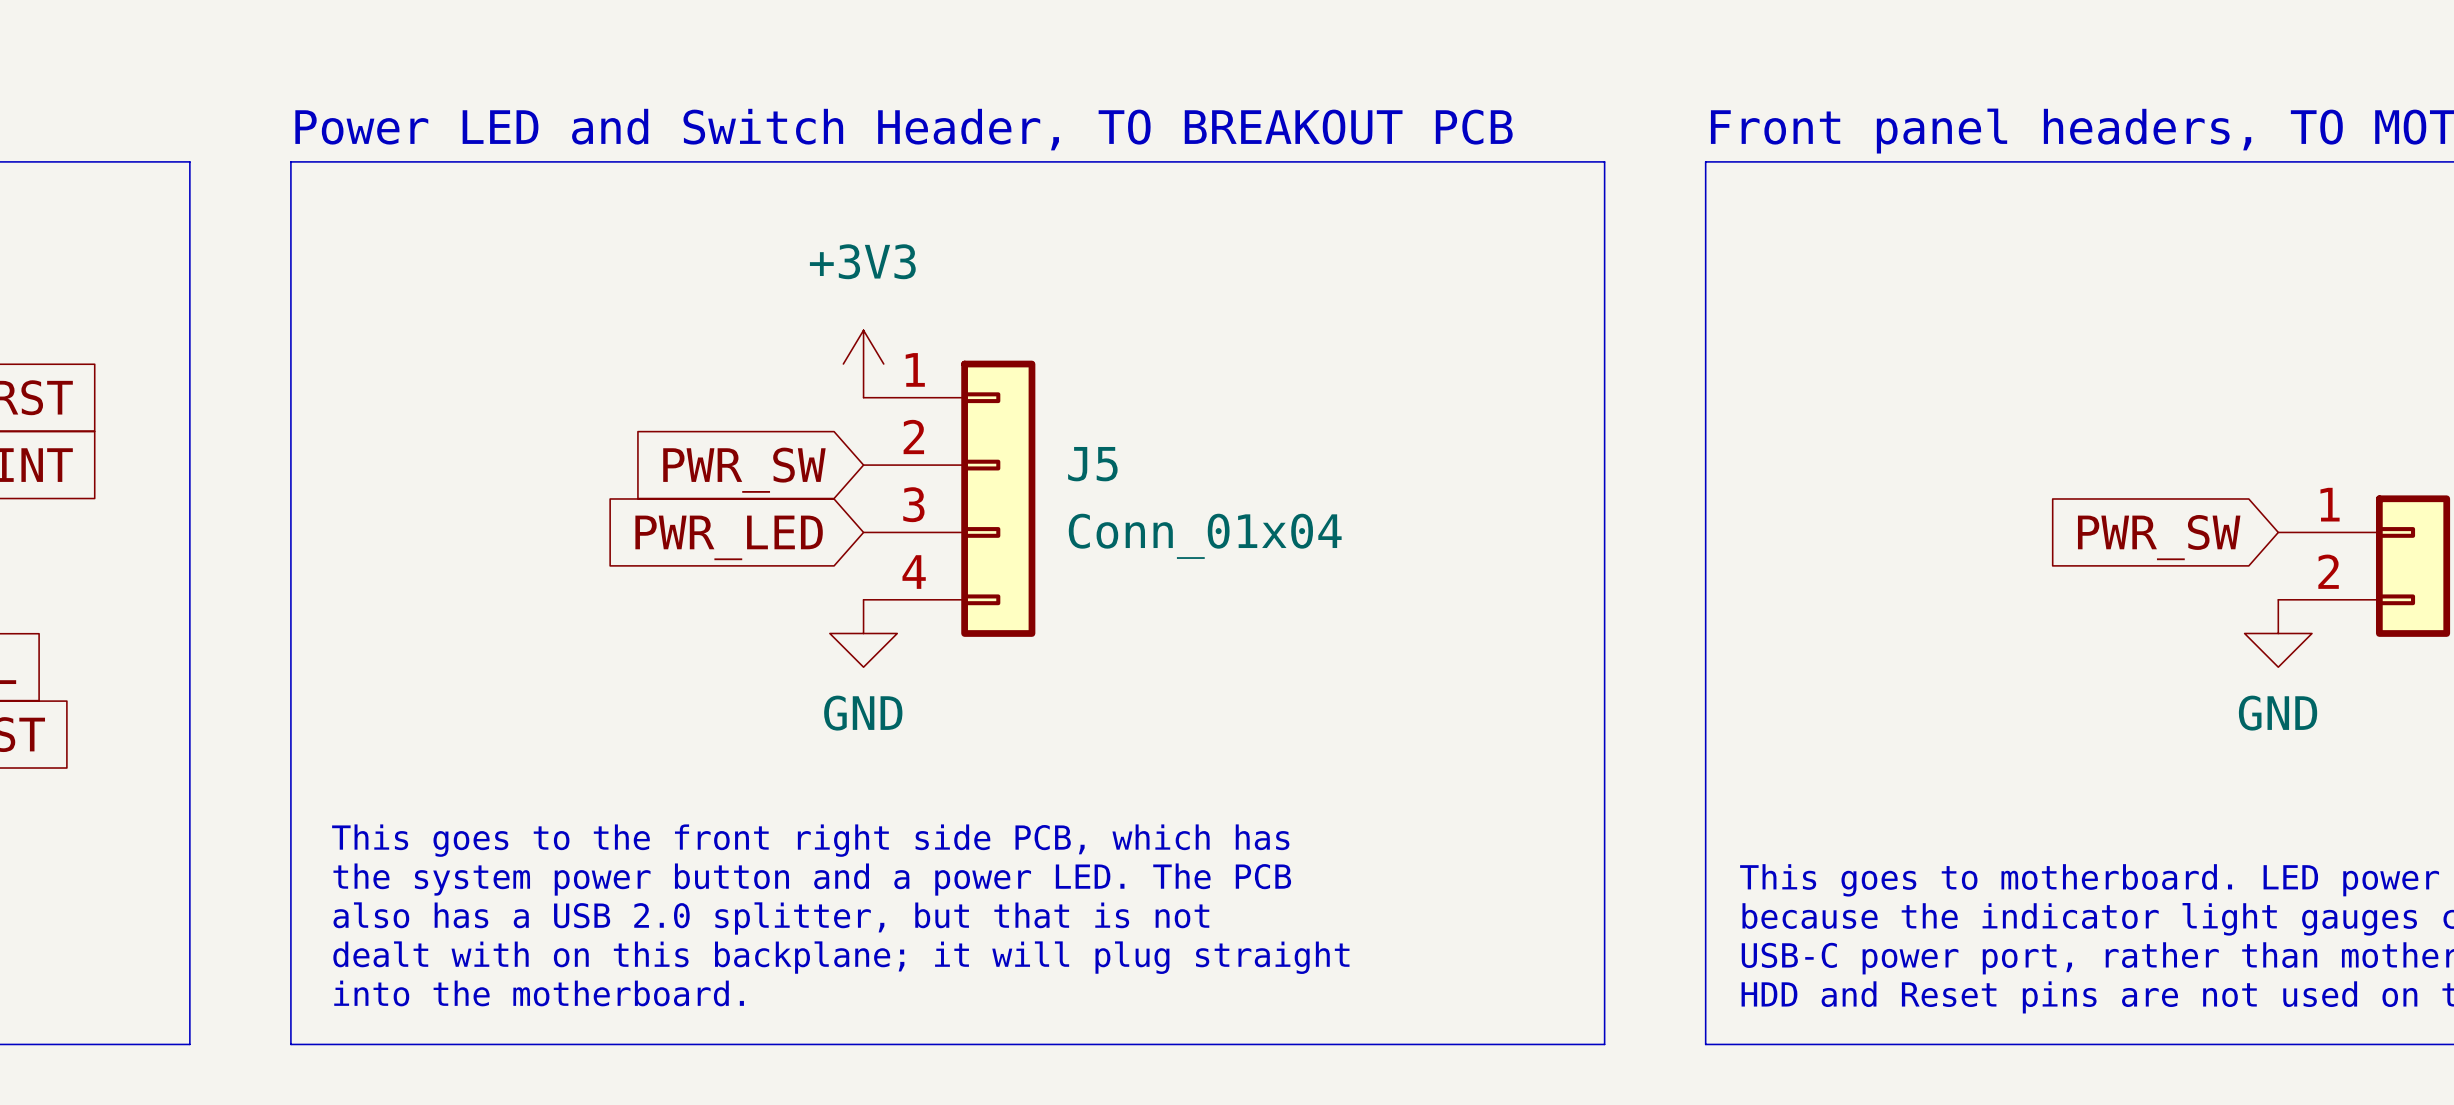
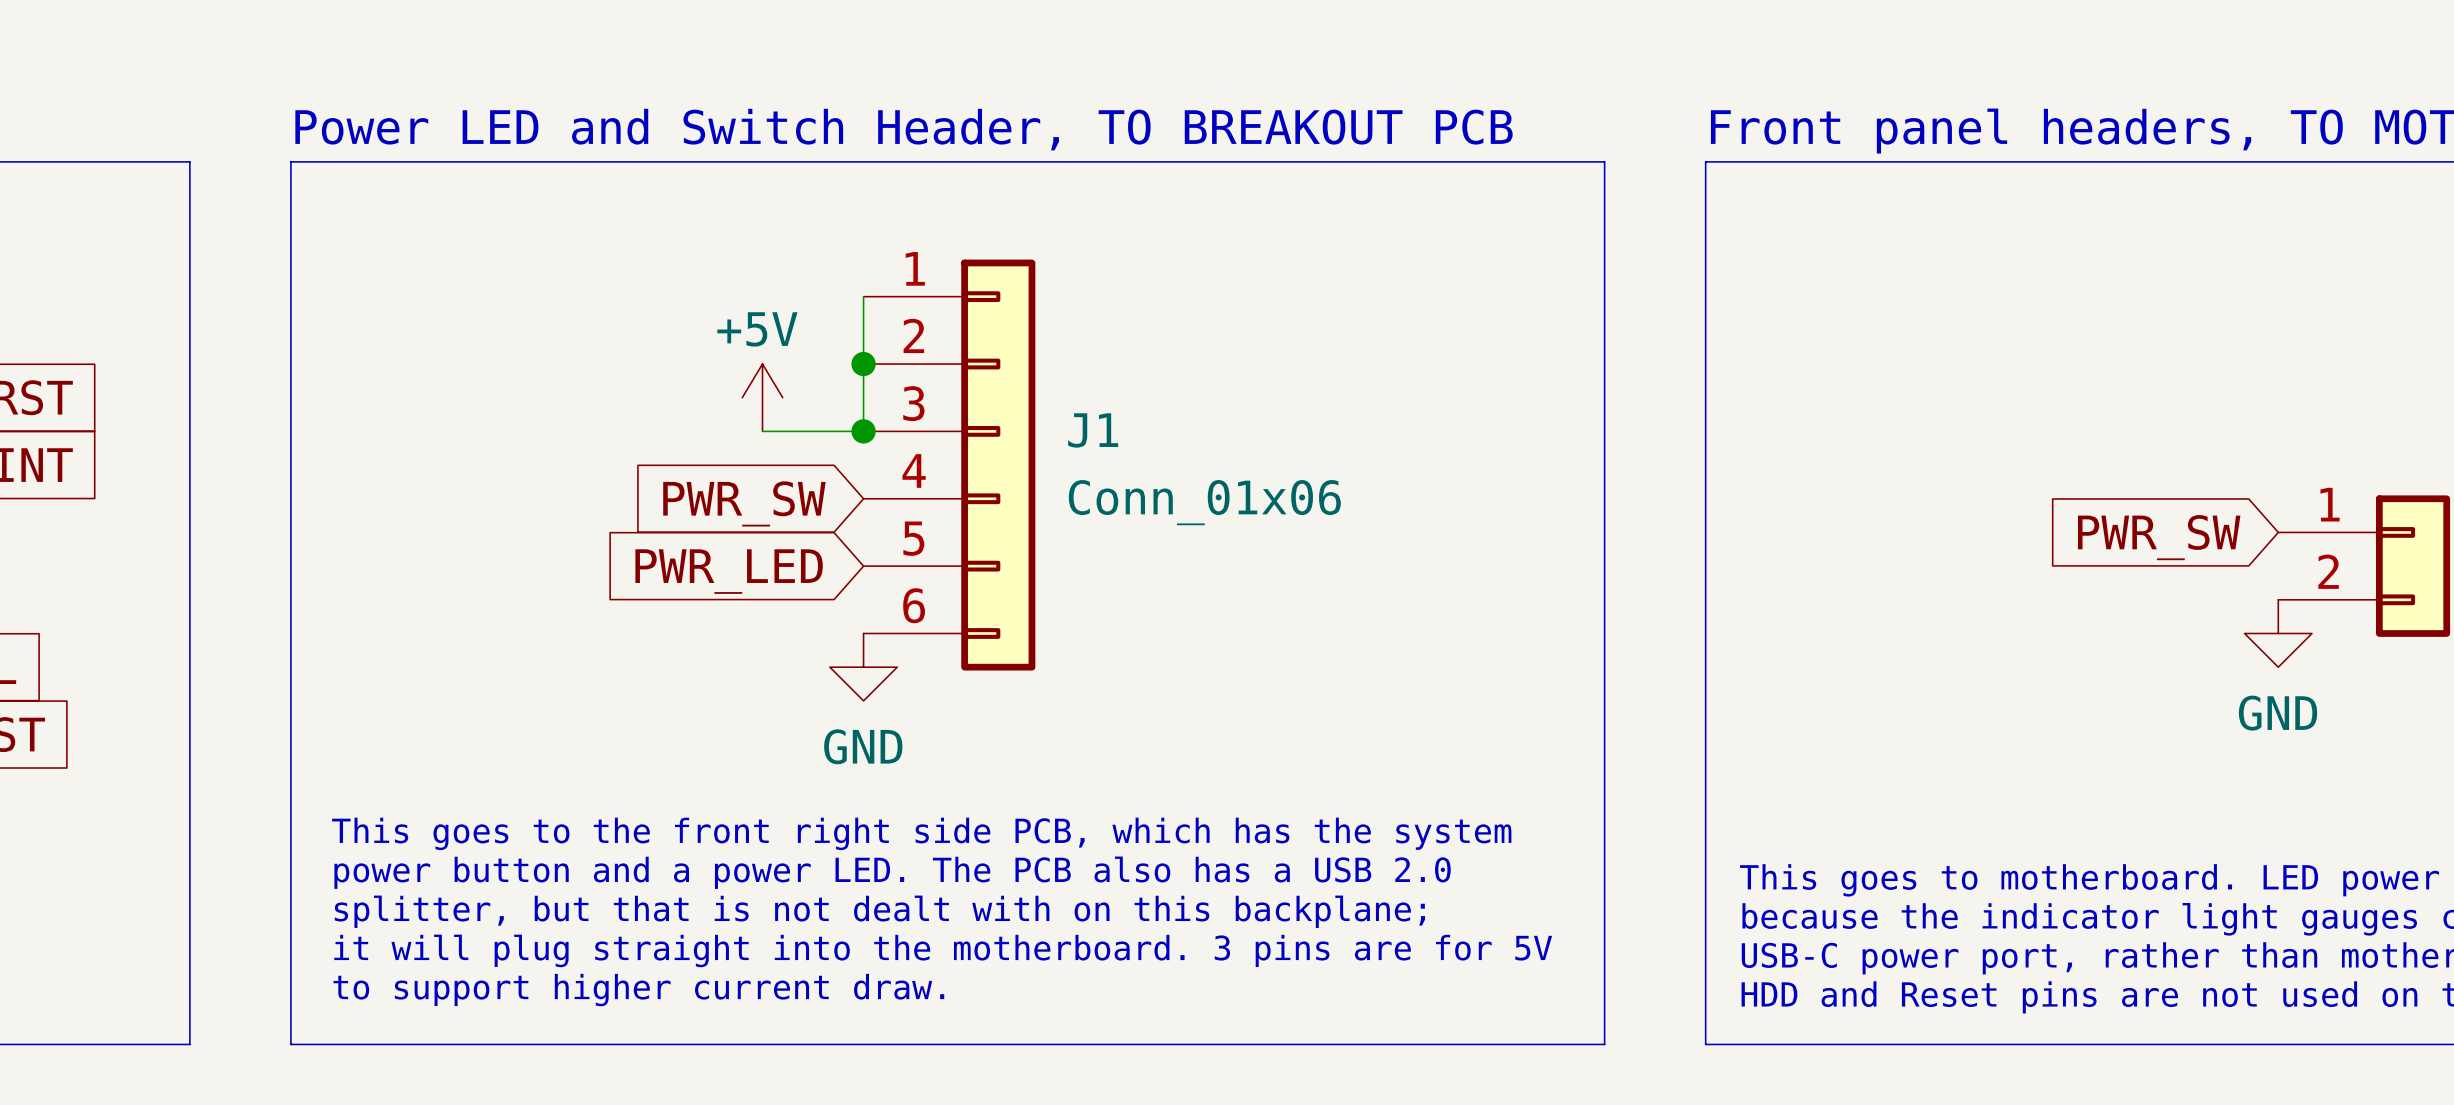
wire: none -> (863, 296) (863, 431) (762, 431)
power symbol: +3V3 (863, 364) -> none
junction: none -> (863, 364)
power symbol: none -> +5V (762, 397)
junction: none -> (863, 431)
J1: none -> Conn_01x06 (949, 465)
global label position: PWR_SW (744, 470) -> PWR_SW (744, 503)
J5: Conn_01x04 (949, 498) -> none
global label position: PWR_LED (729, 537) -> PWR_LED (729, 571)
power symbol position: GND (863, 633) -> GND (863, 667)
text: This goes to the front right side PCB, which has (810, 840) -> This goes to the front right side PCB, which has the system (921, 833)
text: the system power button and a power LED. The PCB (812, 879) -> power button and a power LED. The PCB also has a USB 2.0 (892, 872)
text: also has a USB 2.0 splitter, but that is not (771, 918) -> splitter, but that is not dealt with on this backplane; (879, 911)
text: dealt with on this backplane; it will plug straight (841, 957) -> it will plug straight into the motherboard. 3 pins are for 5V (943, 950)
text: into the motherboard. (539, 993) -> to support higher current draw. (638, 990)

